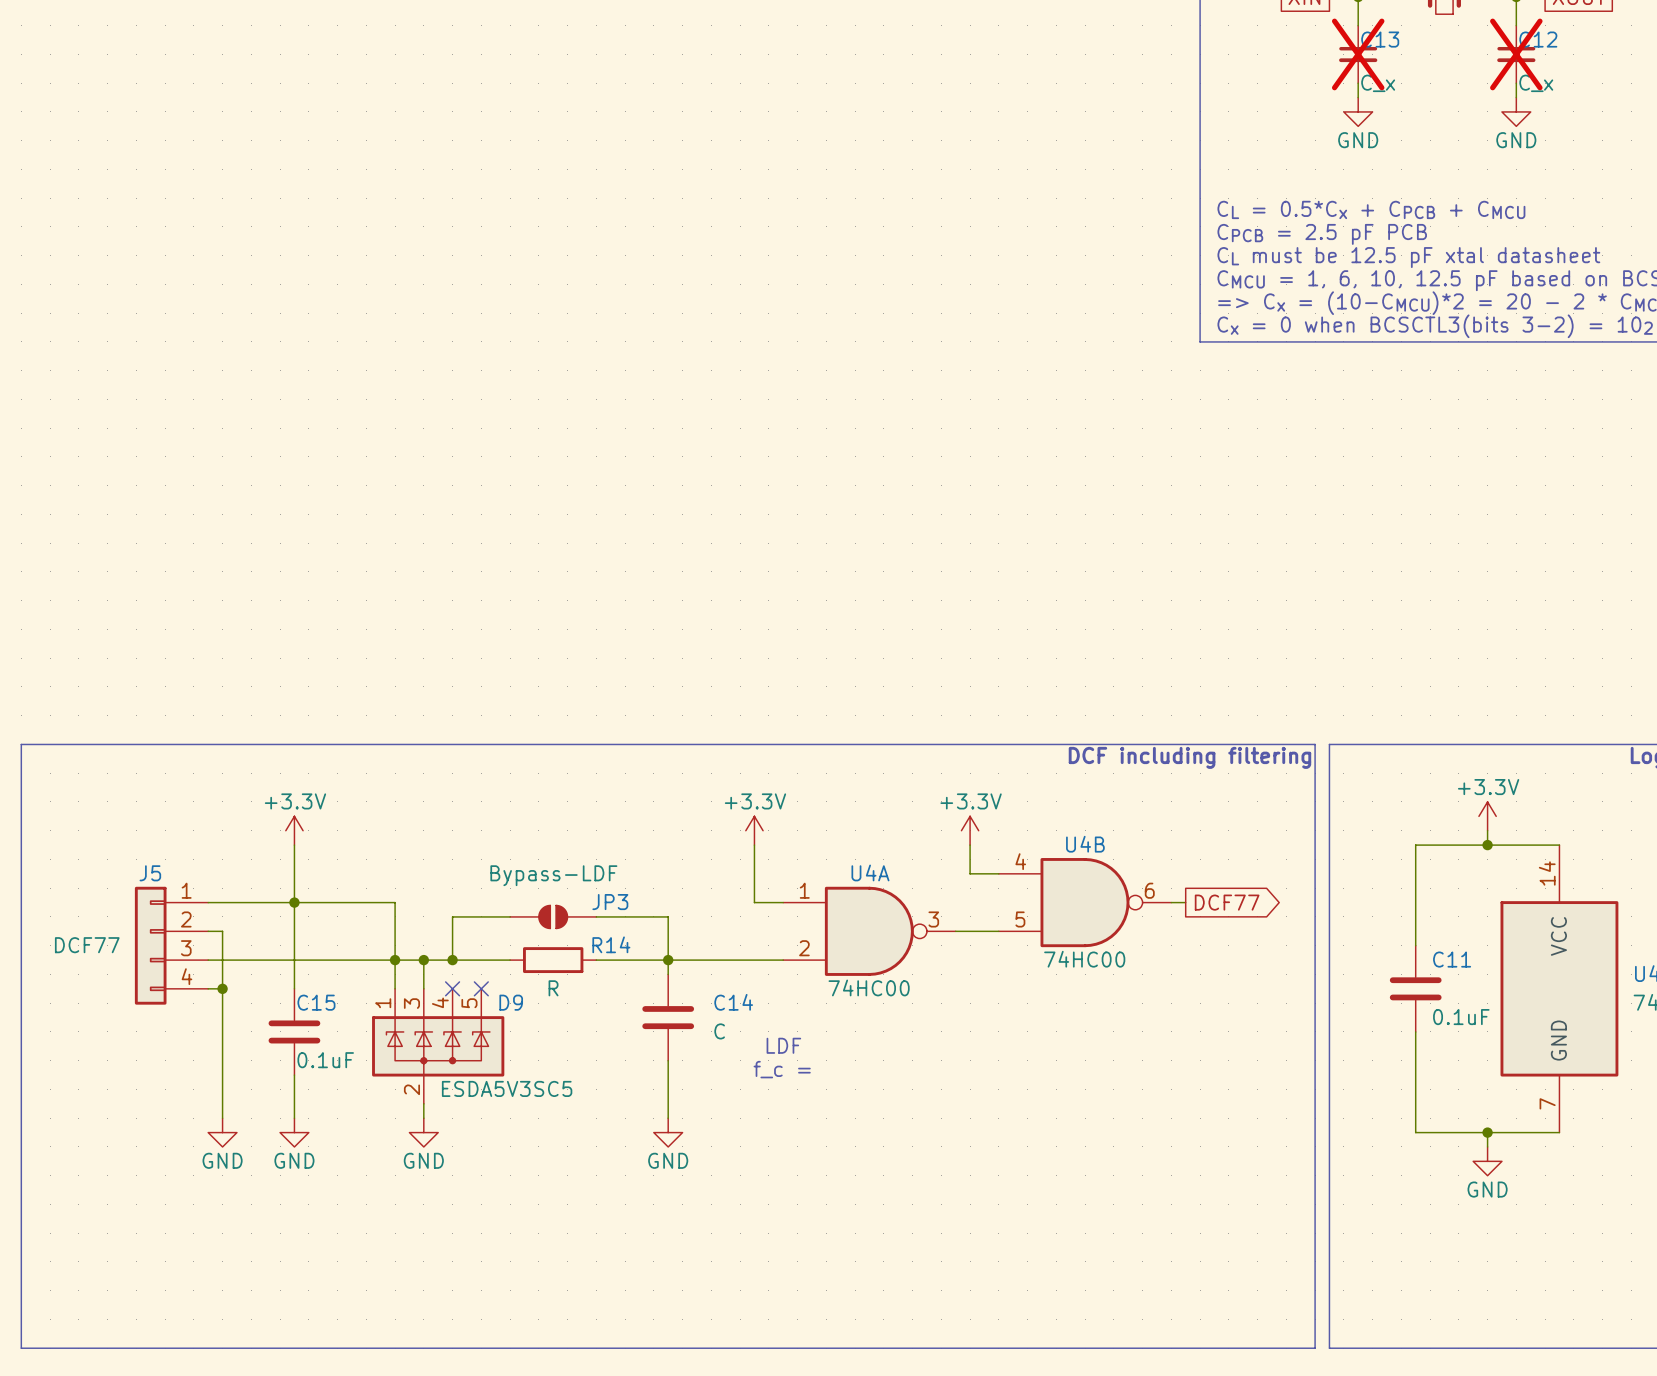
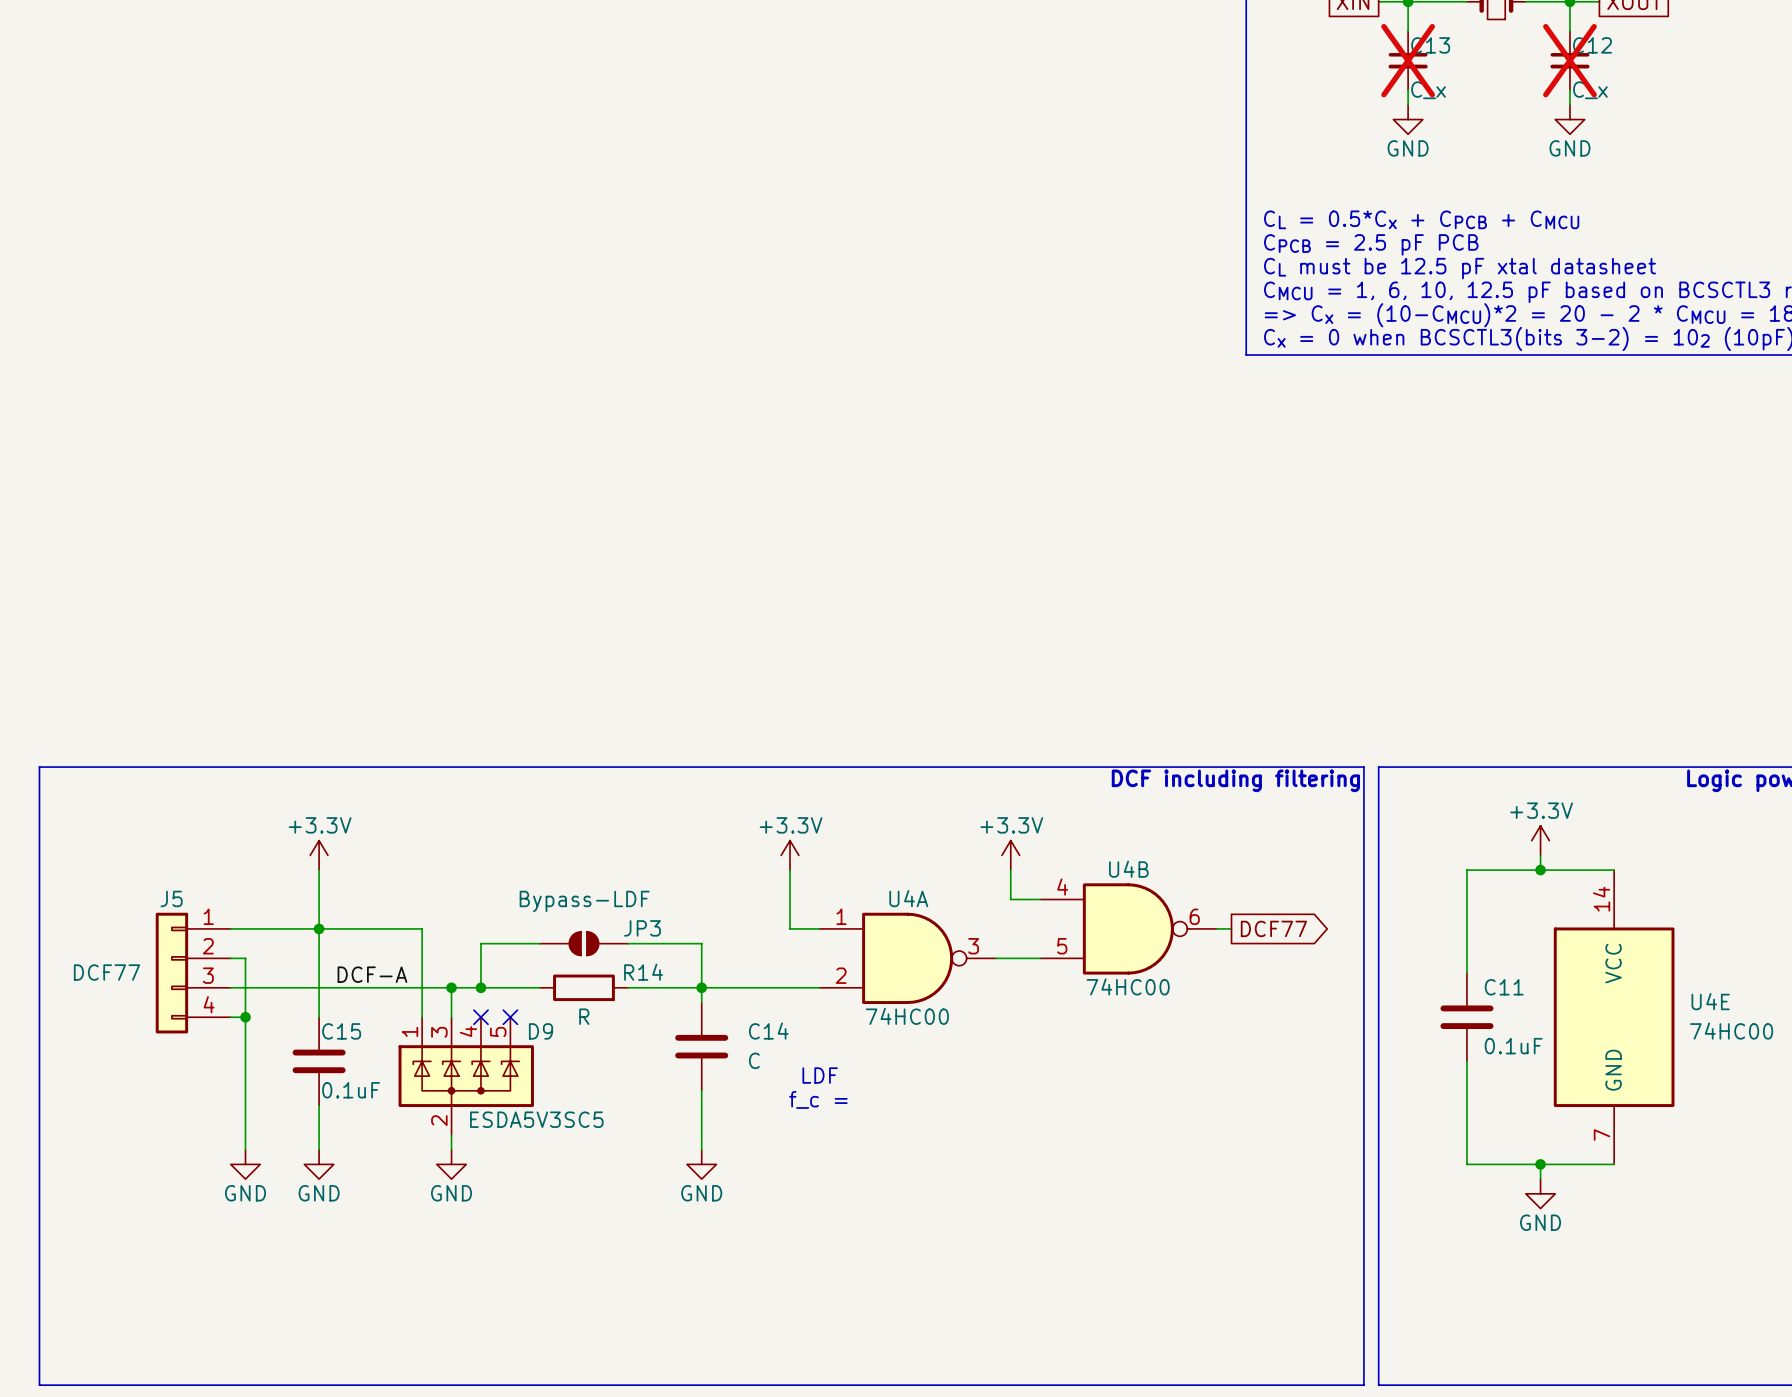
label: none -> DCF-A (372, 974)
junction: (395, 960) -> none

